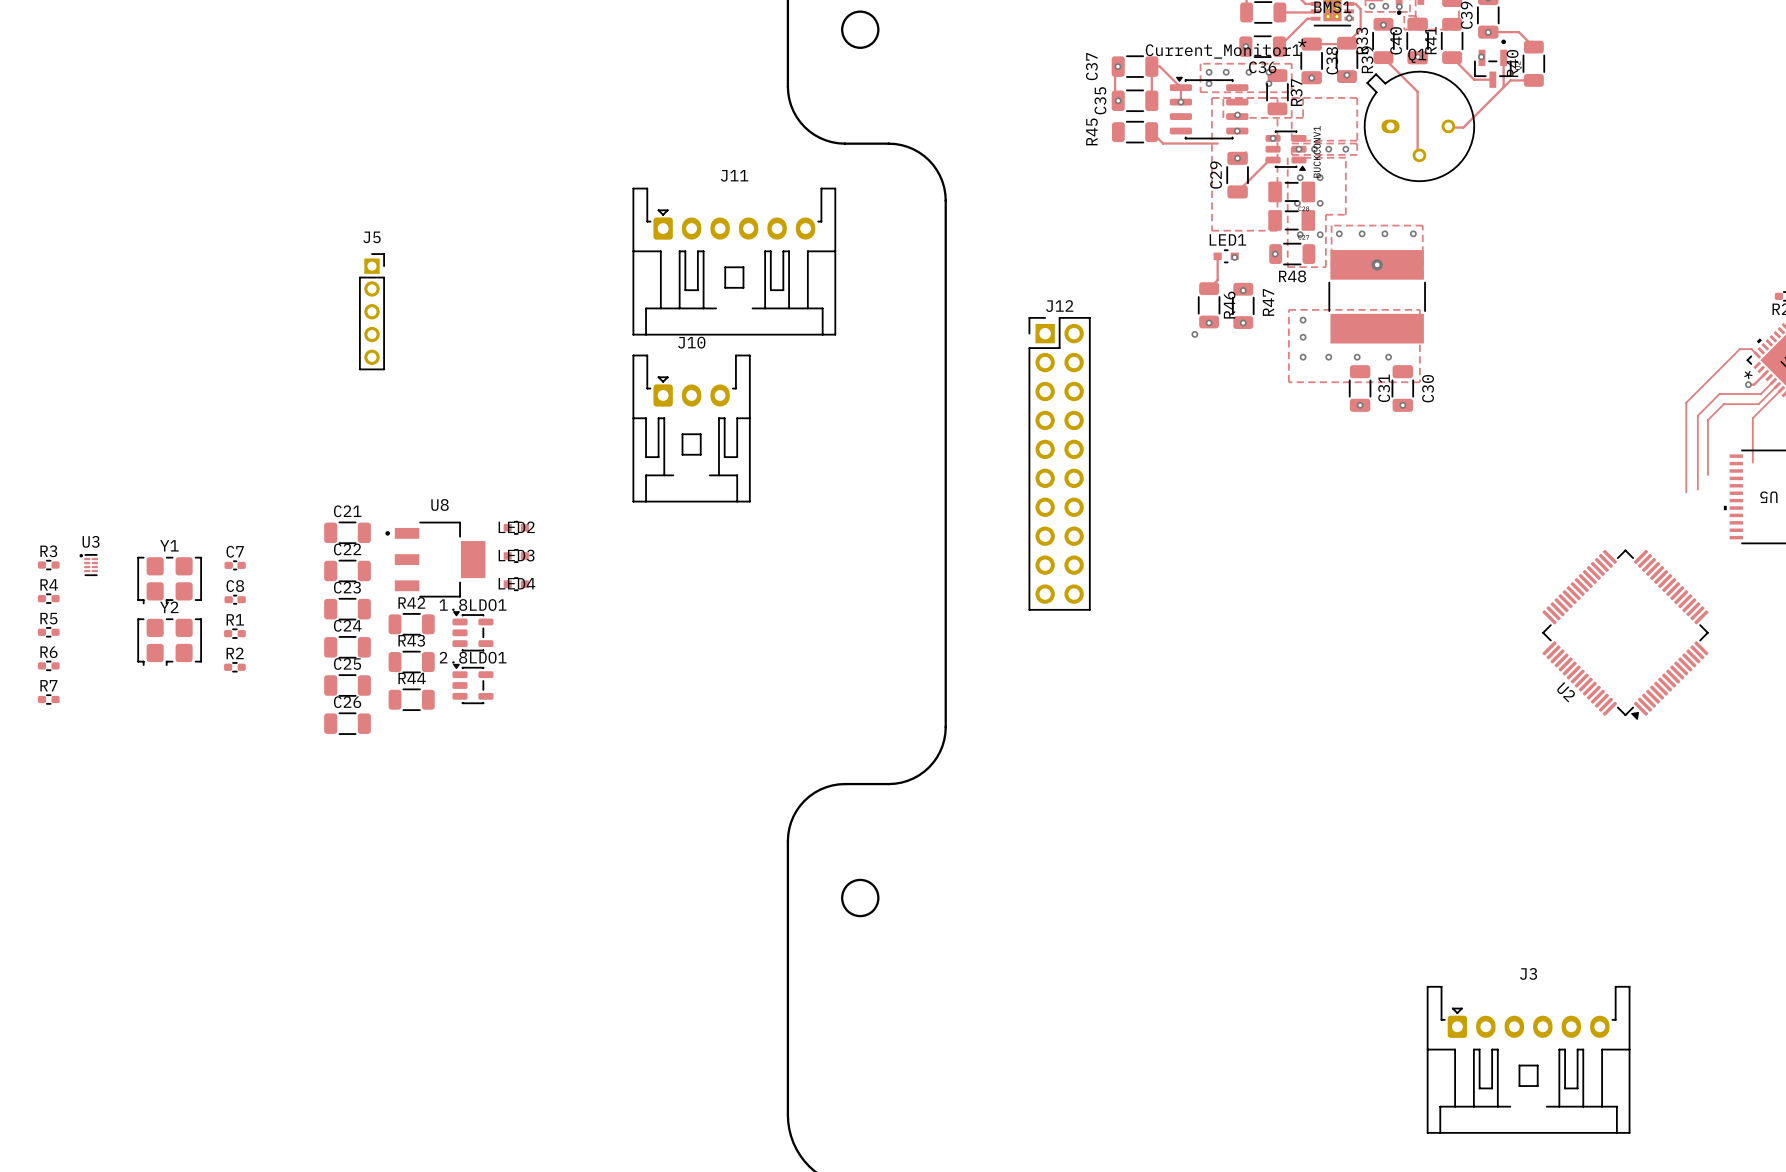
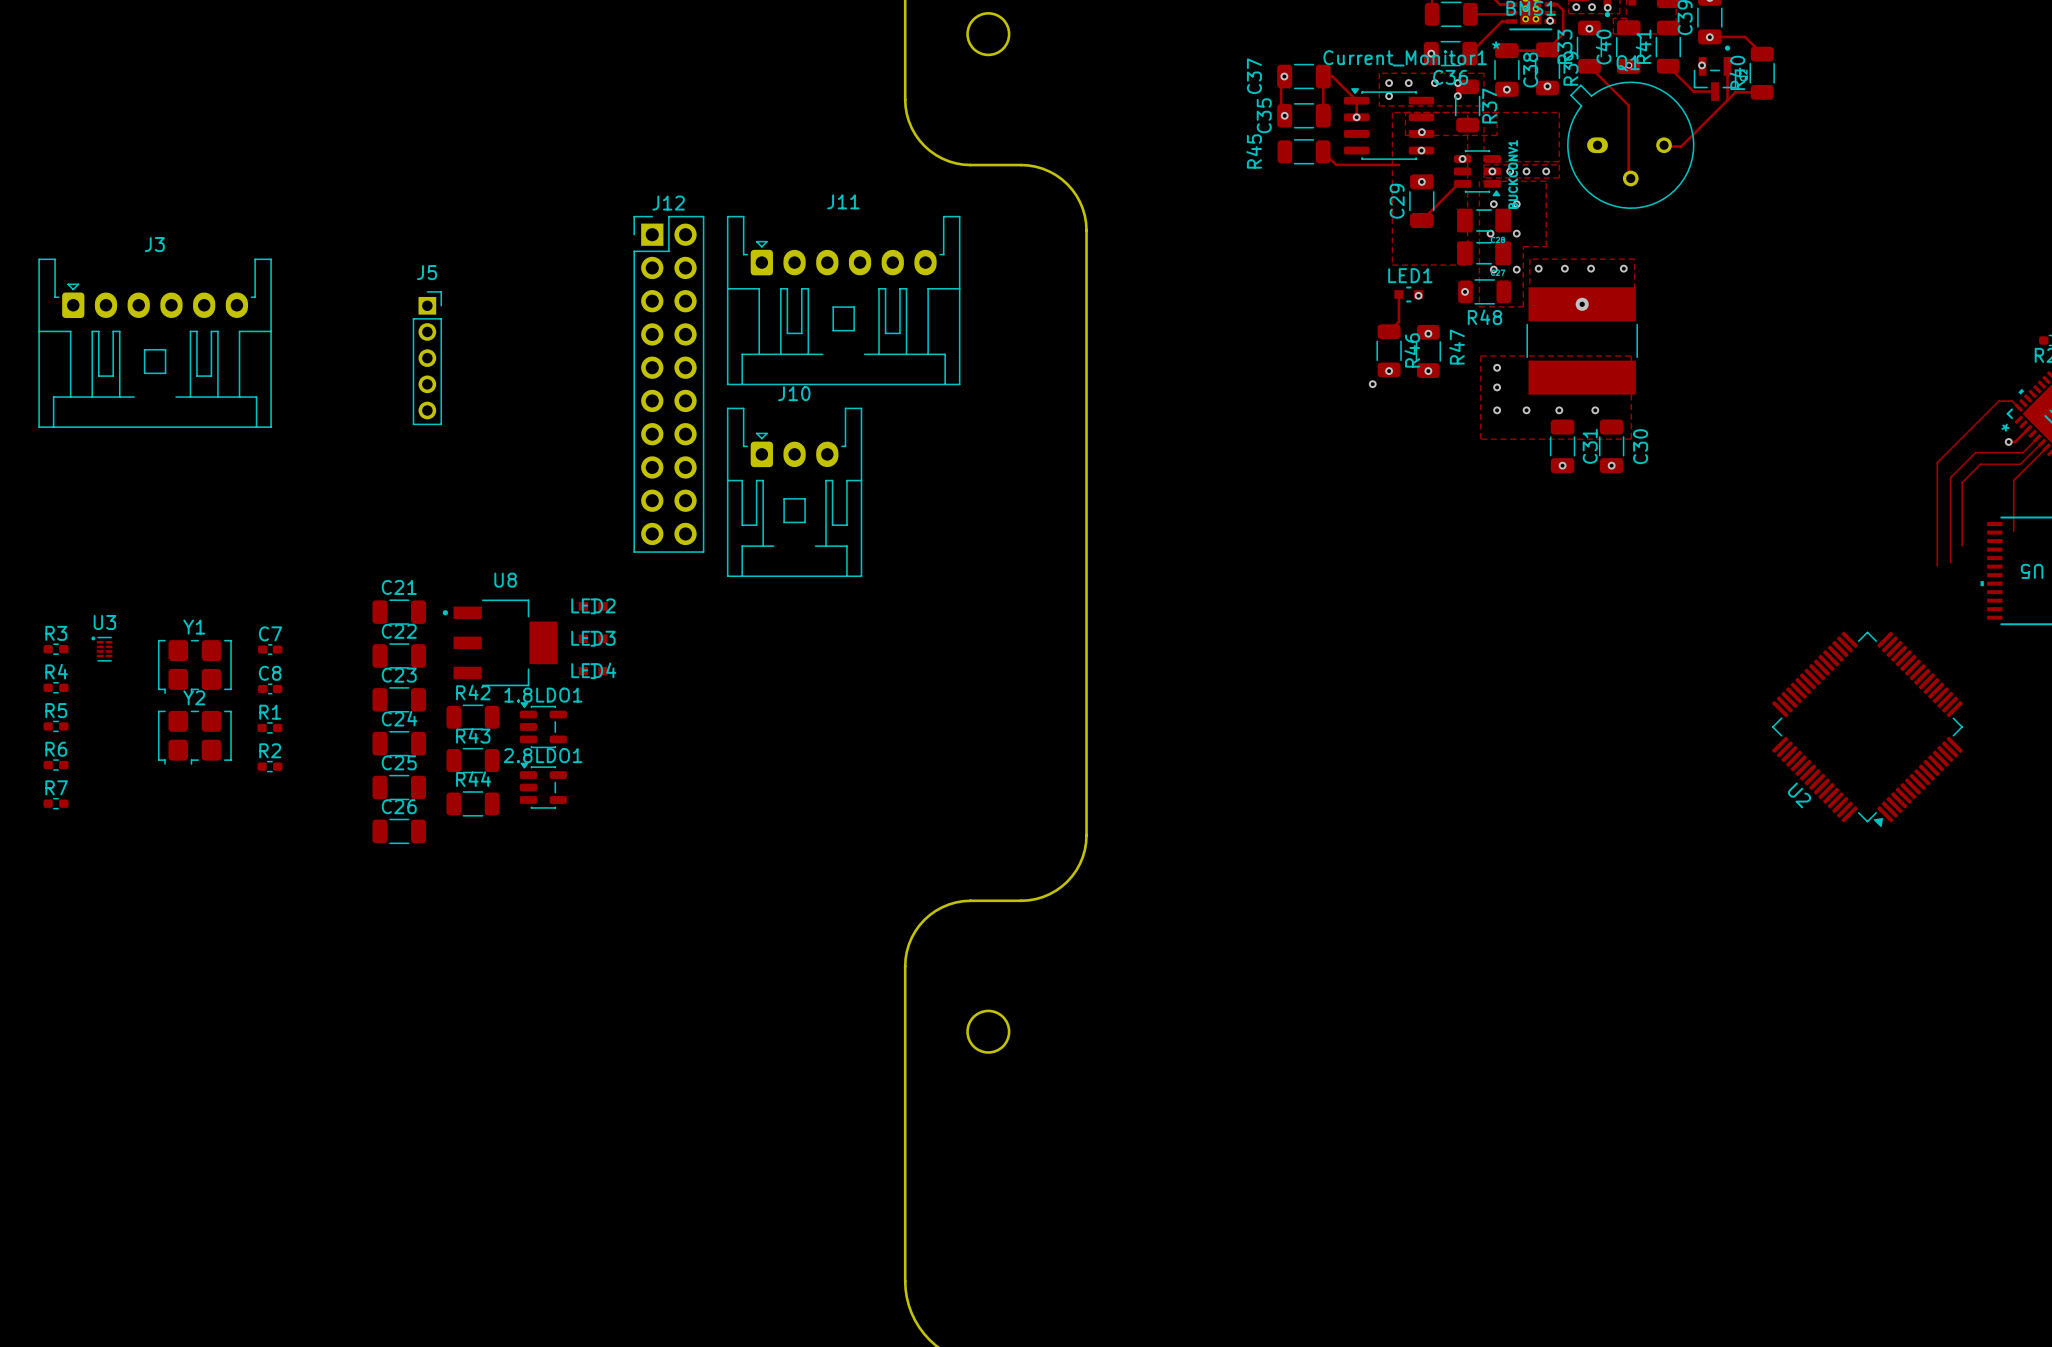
J12 position: (1059, 463) -> (668, 384)
J3 position: (1528, 1059) -> (155, 343)

